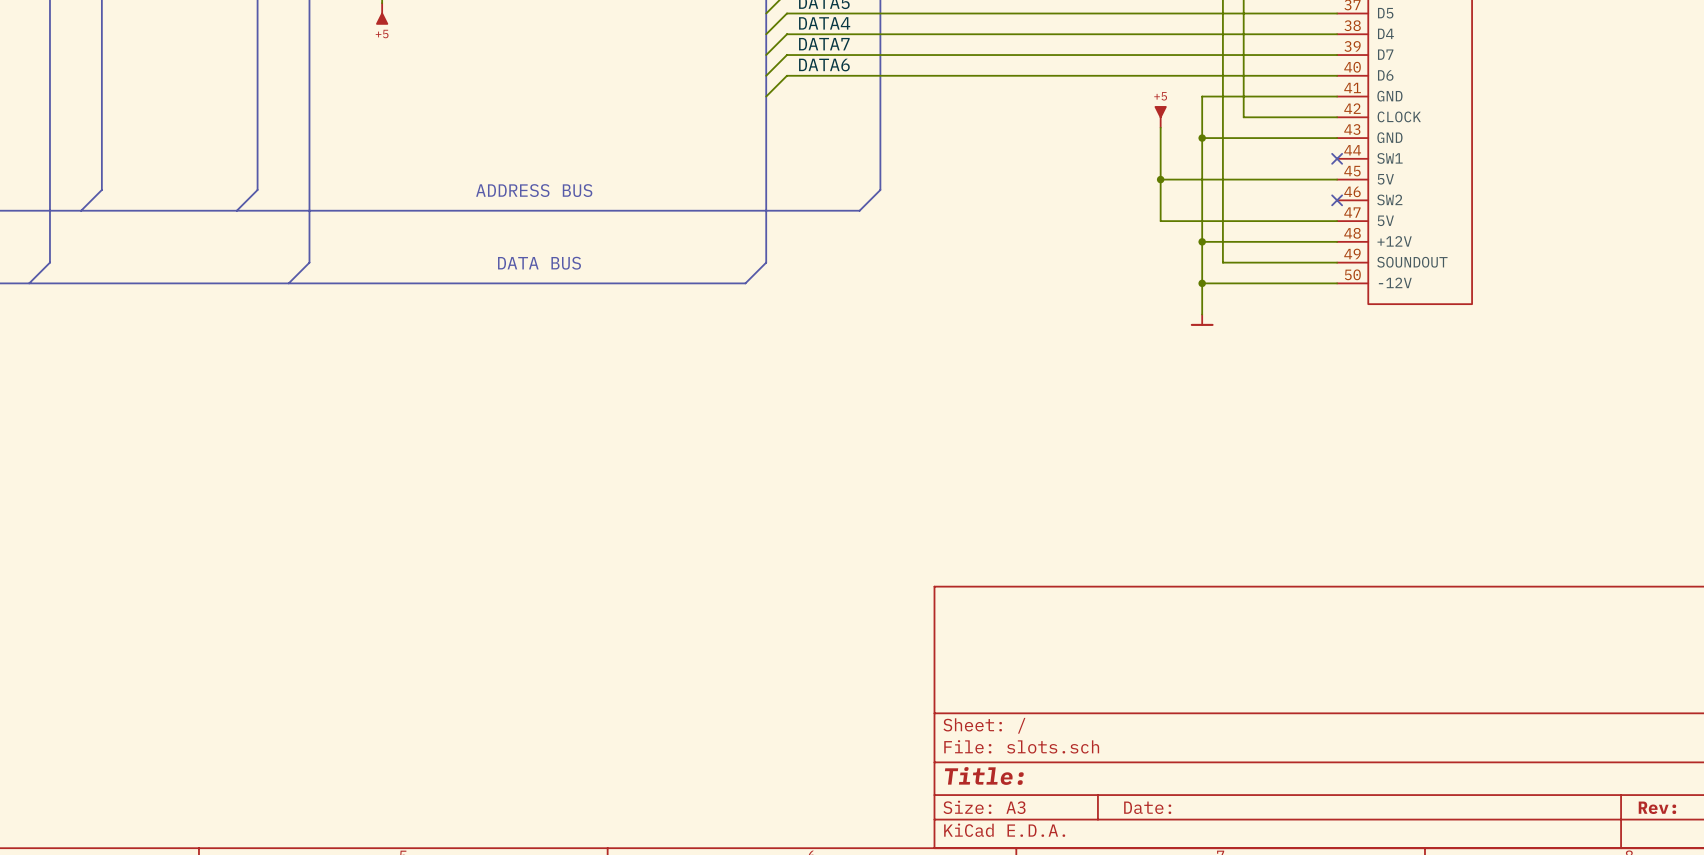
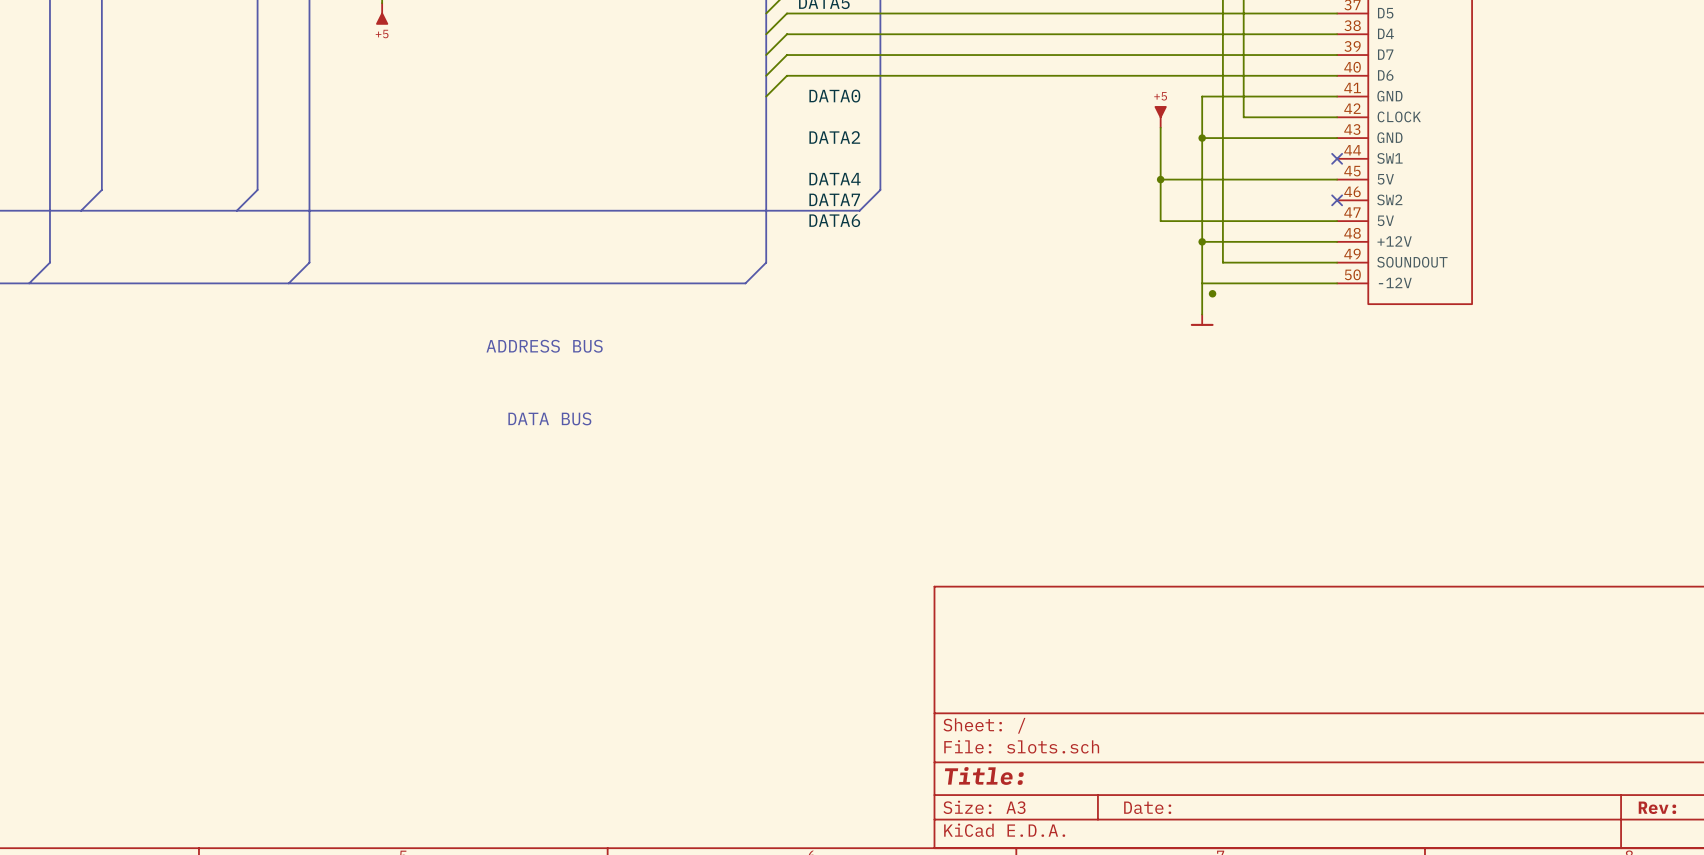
label: DATA4 (824, 23) -> none
label position: DATA7 (824, 44) -> DATA7 (834, 199)
label: DATA6 (824, 65) -> none
label: none -> DATA0 (834, 96)
label: none -> DATA2 (834, 137)
label: none -> DATA4 (835, 179)
text position: ADDRESS BUS (534, 190) -> ADDRESS BUS (544, 346)
label: none -> DATA6 (834, 220)
text position: DATA BUS (539, 263) -> DATA BUS (549, 418)
junction position: (1202, 283) -> (1212, 293)

